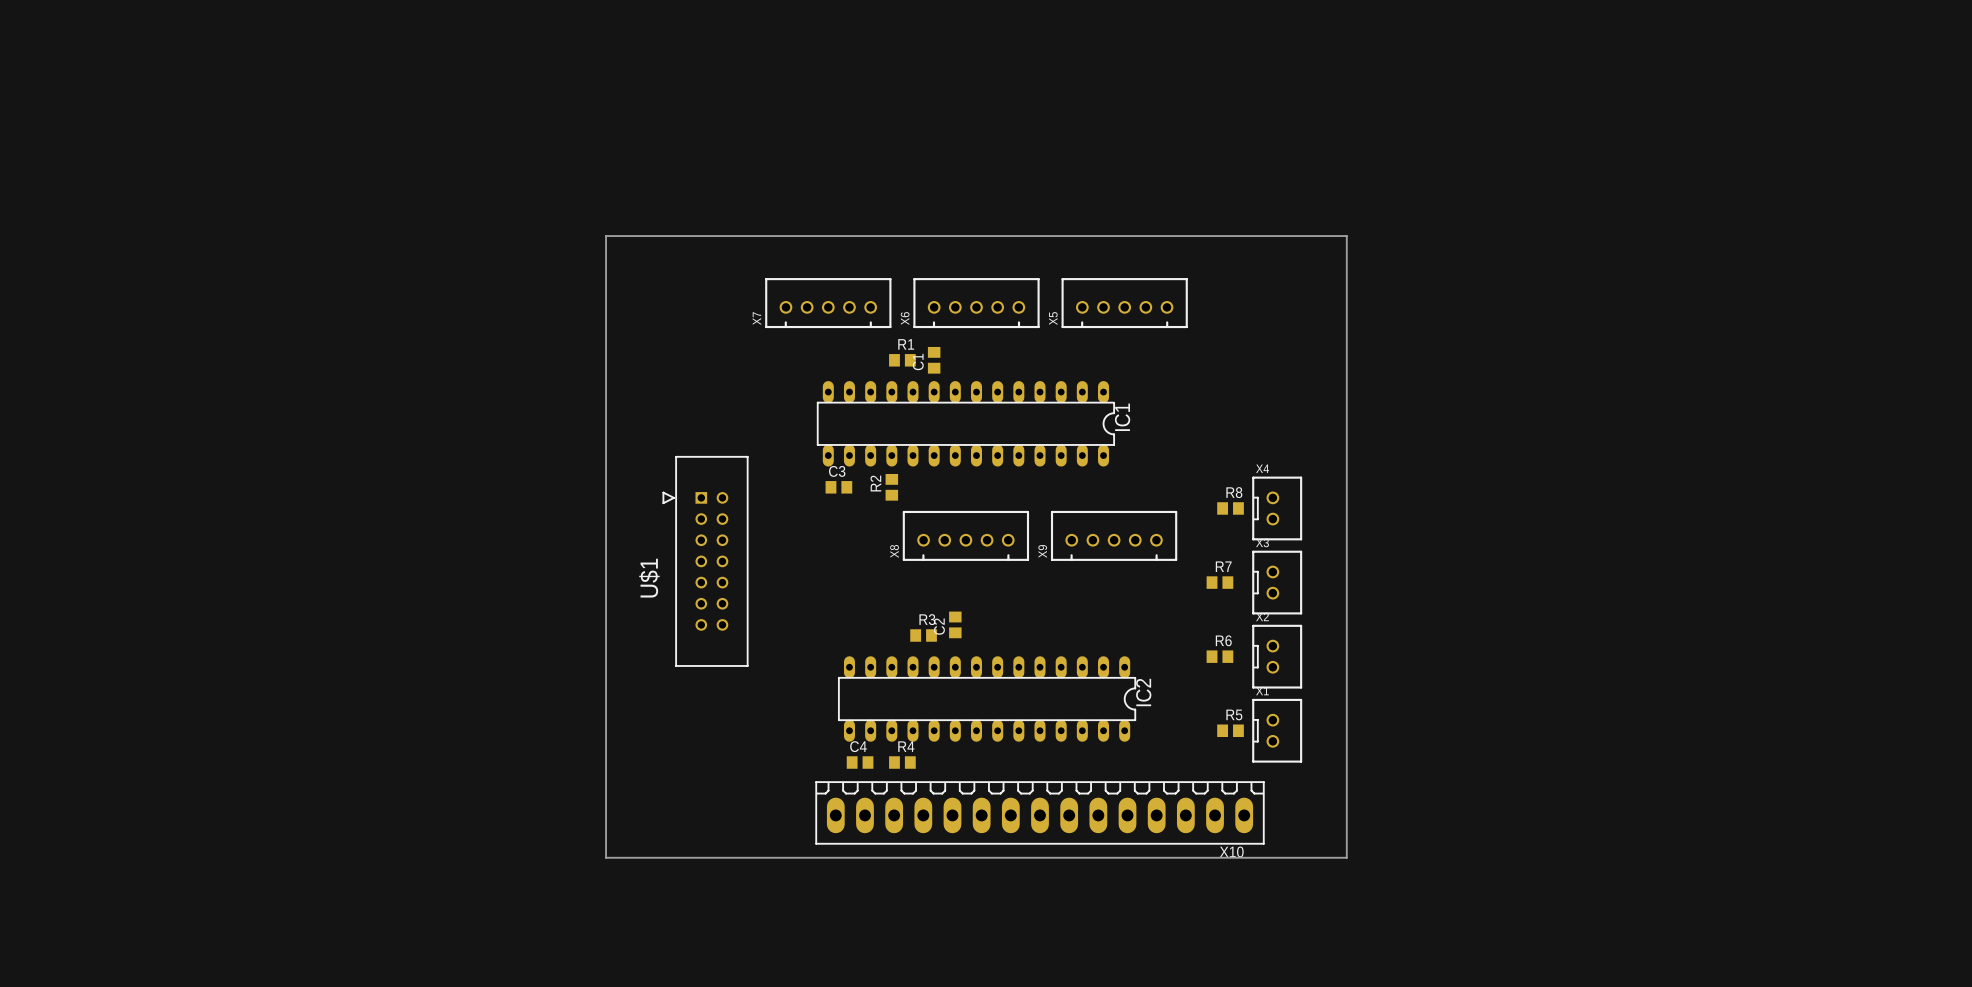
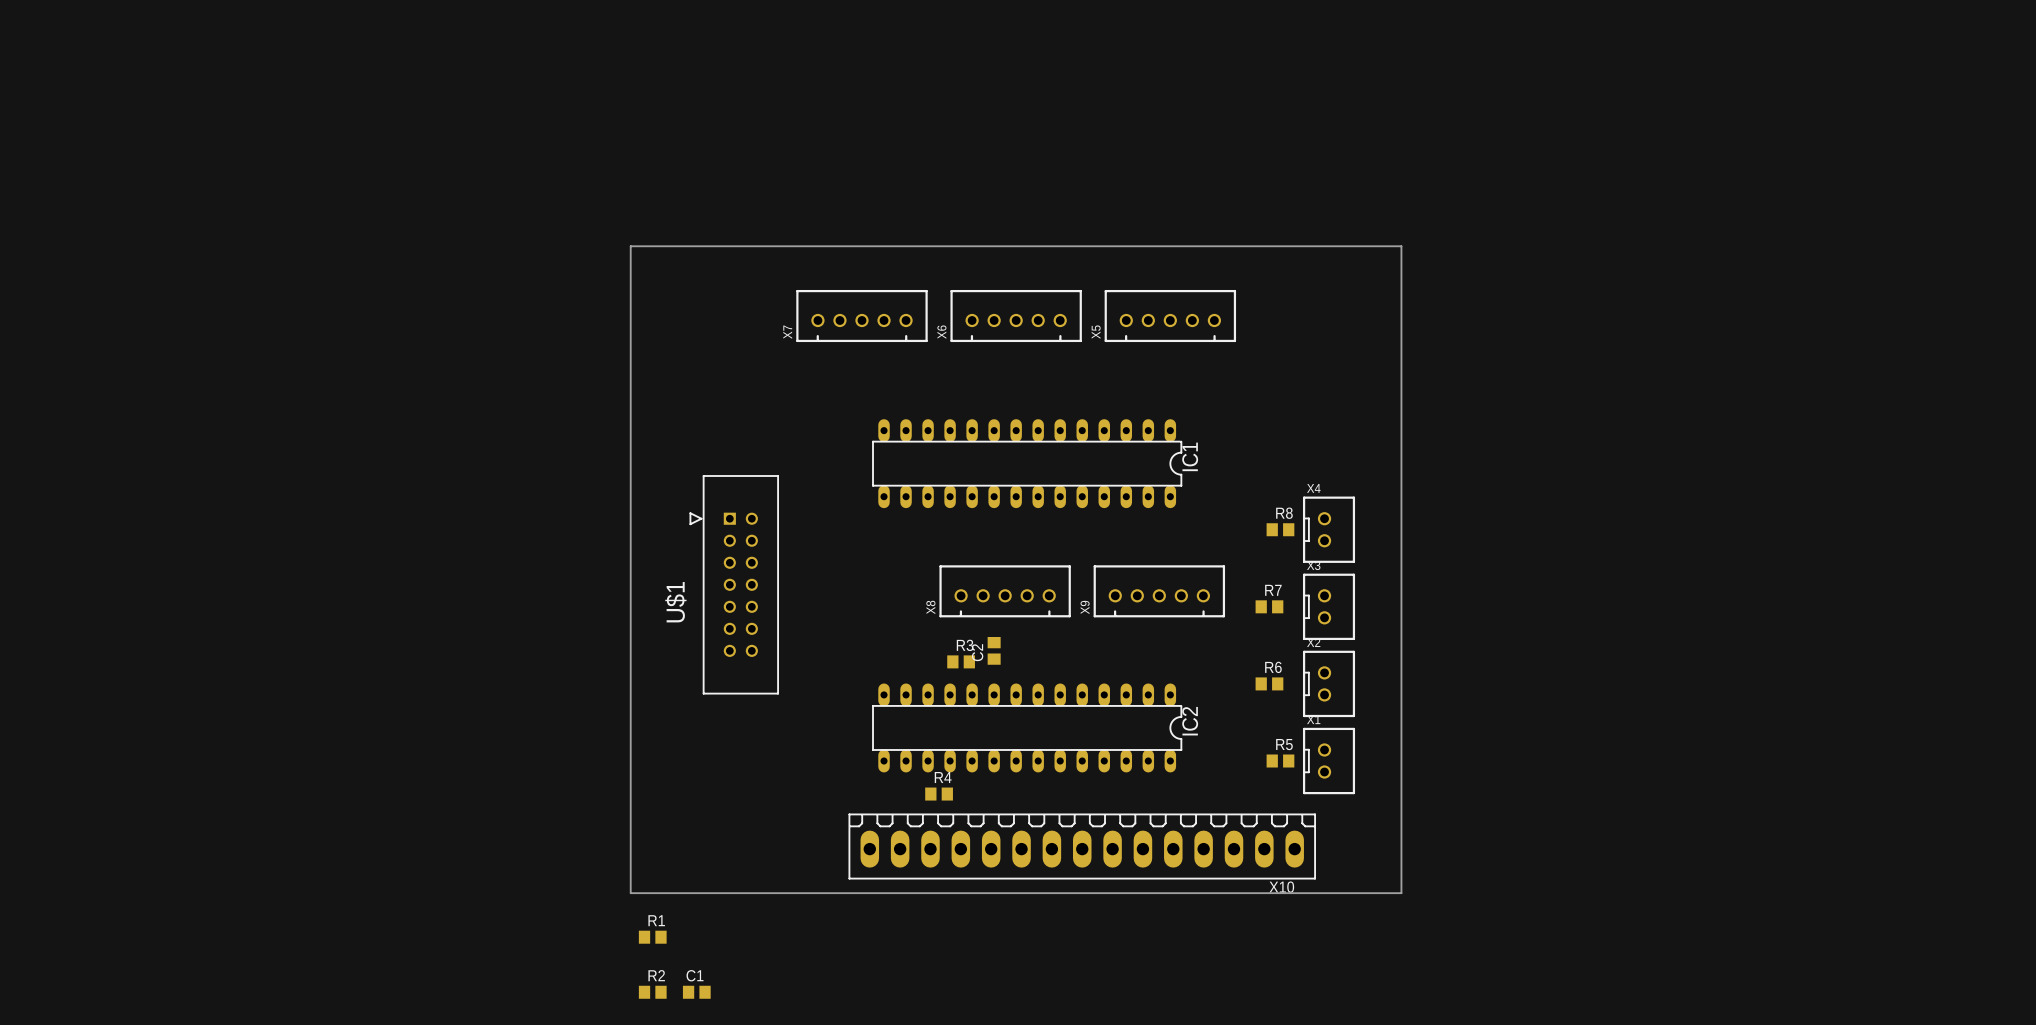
R1 position: (902, 360) -> (652, 937)
C1 rotation: 0° (934, 360) -> 90° clockwise (696, 992)
C1 position: (934, 360) -> (696, 992)
IC1 position: (965, 423) -> (1027, 463)
C3: (838, 487) -> none
R2 rotation: 0° (891, 487) -> 90° clockwise (652, 992)
R2 position: (891, 487) -> (652, 992)
X8 position: (965, 535) -> (1005, 591)
X9 position: (1114, 535) -> (1159, 591)
C4: (860, 762) -> none

